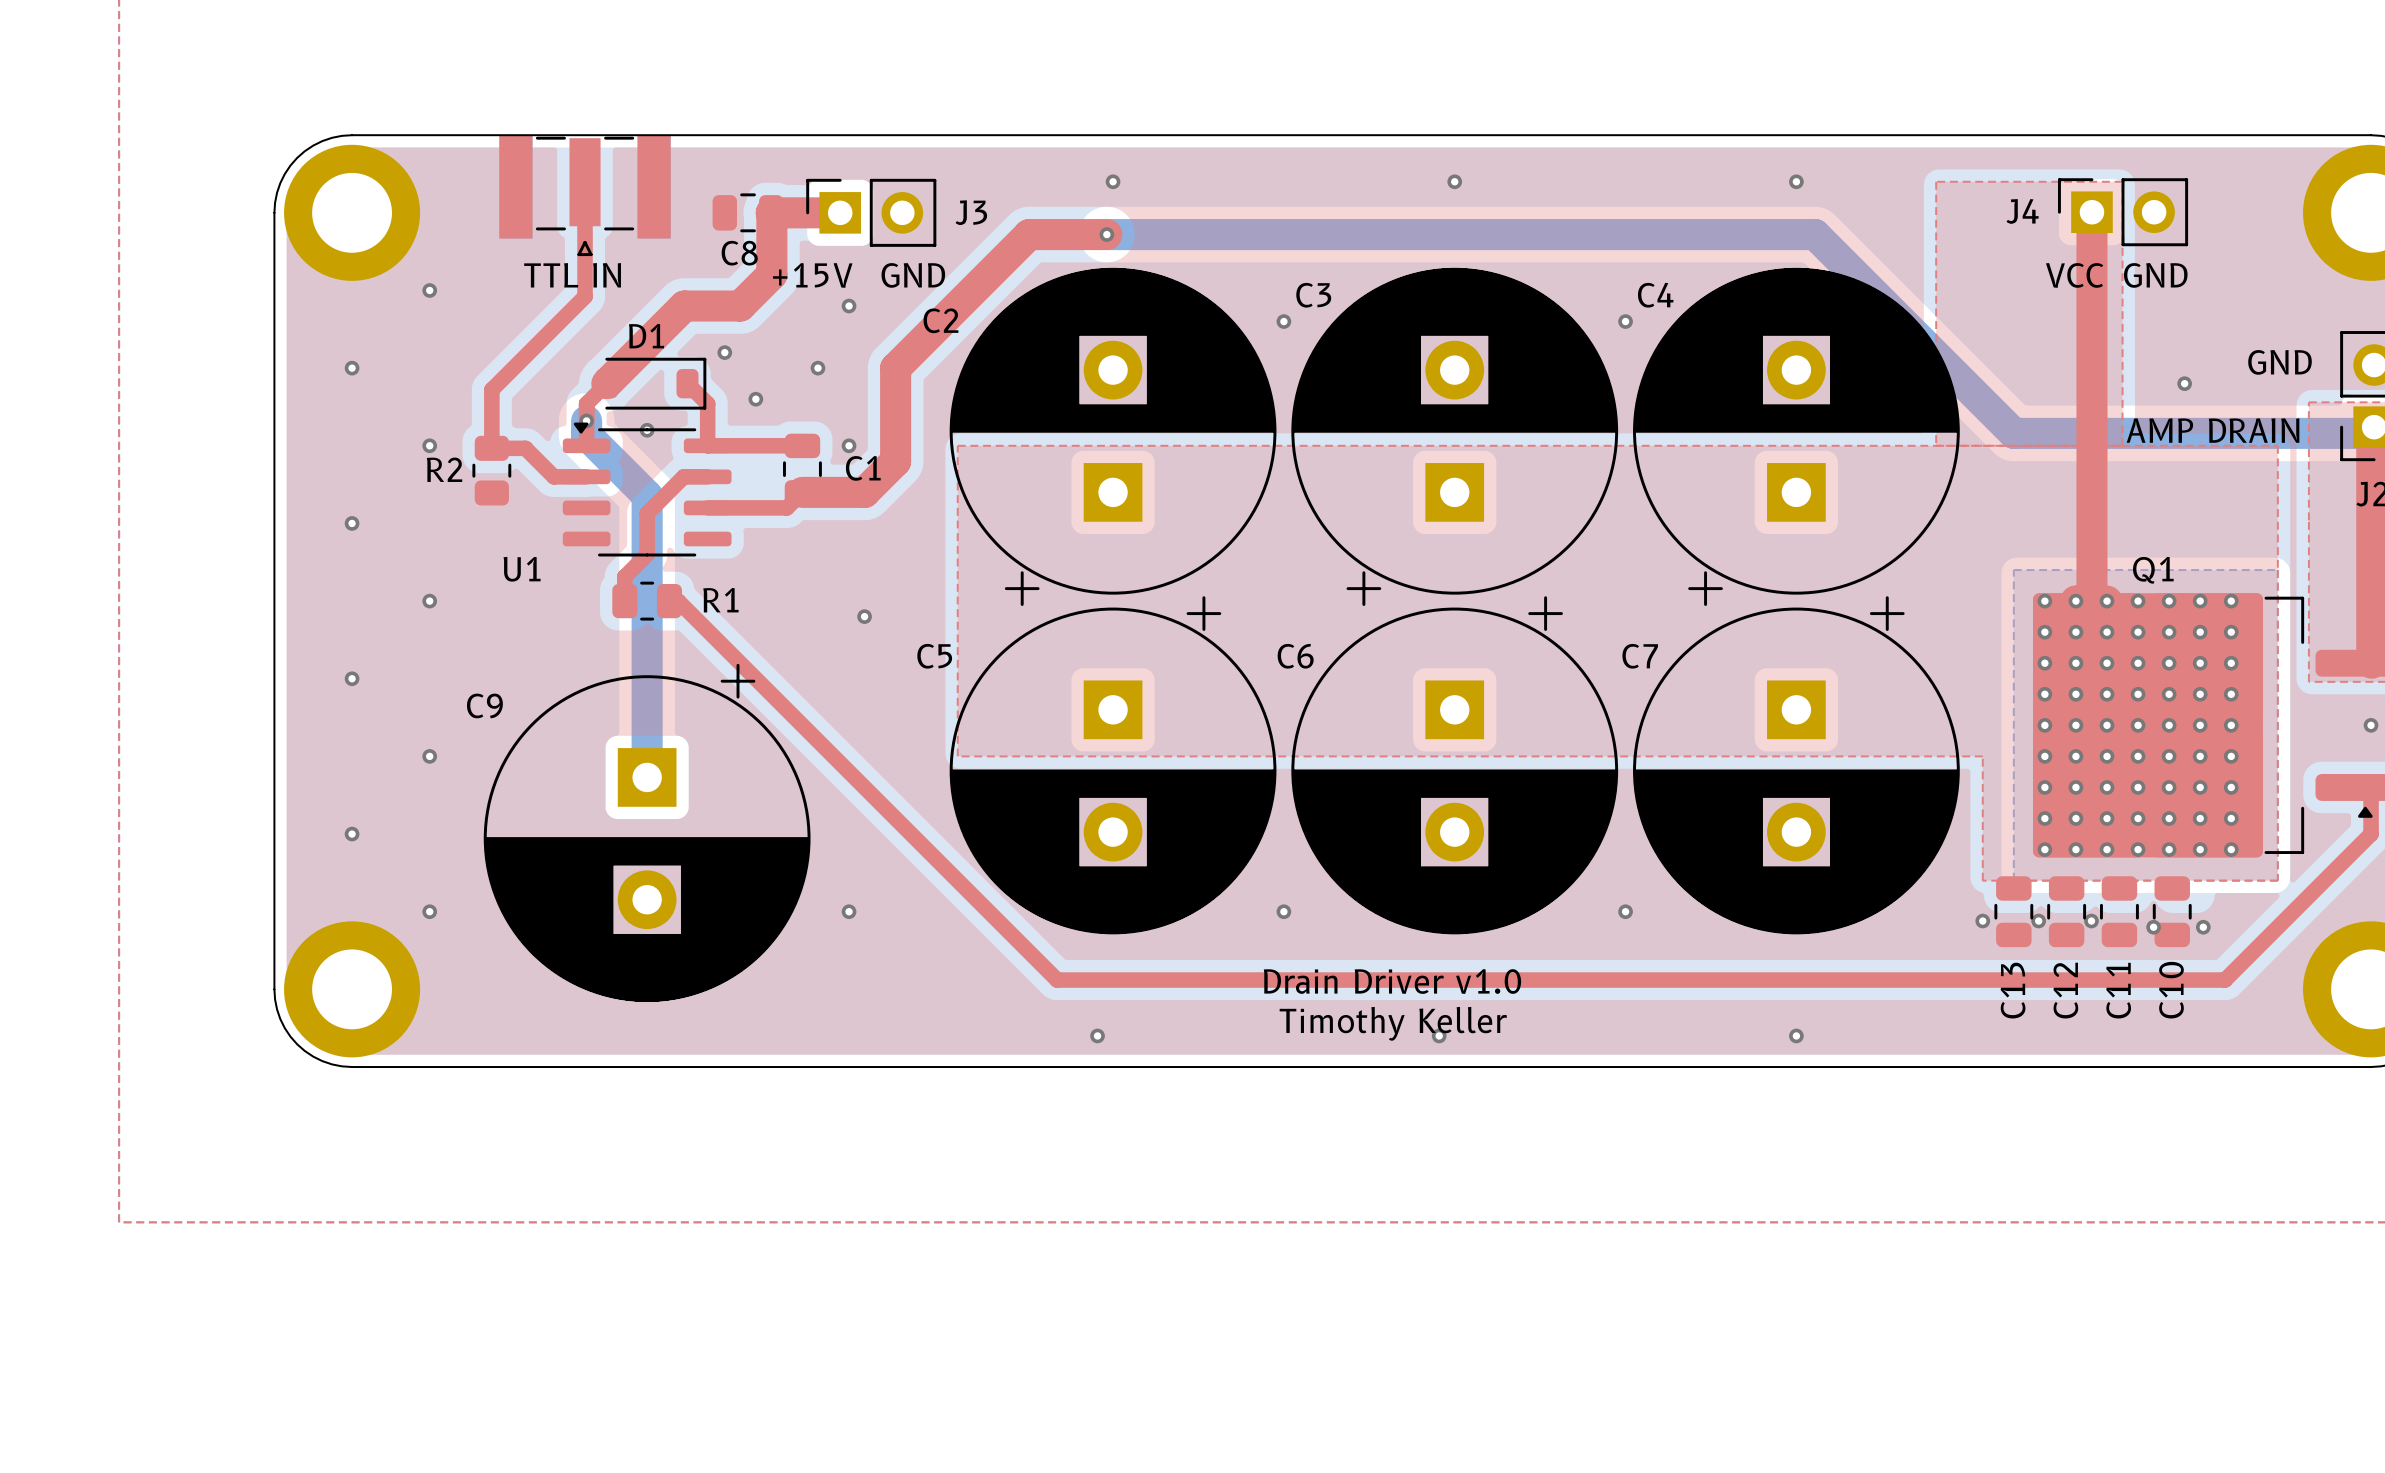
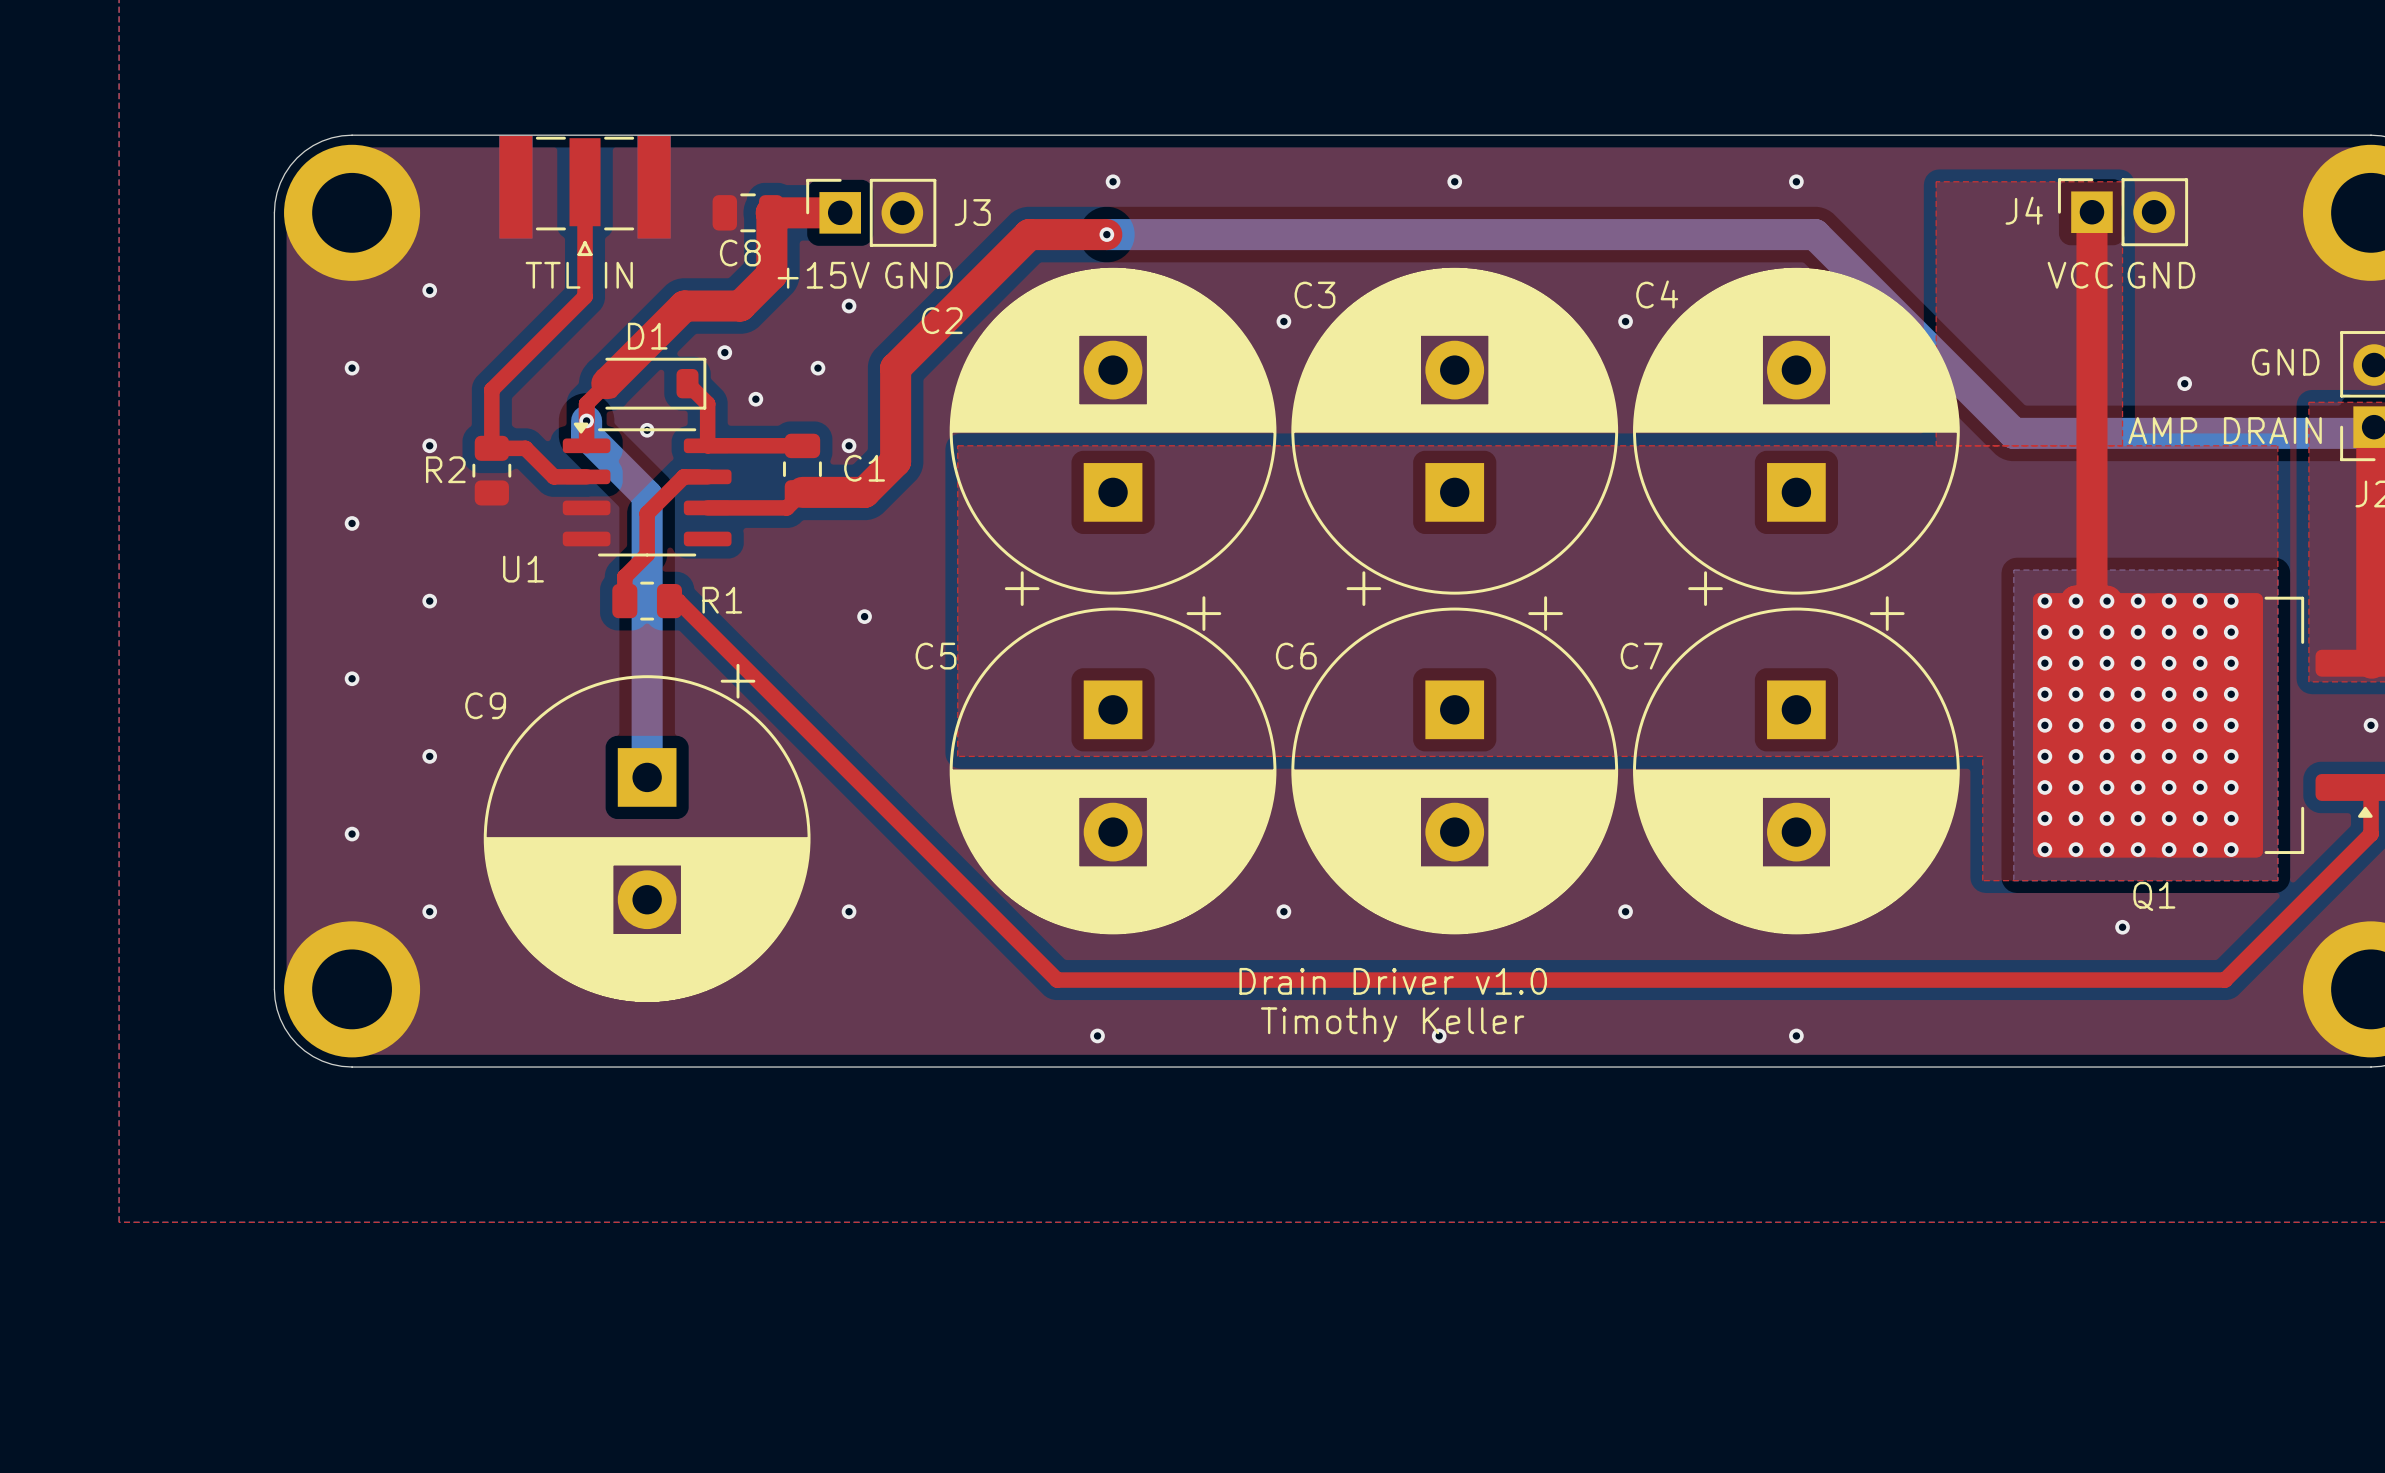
Q1 name position: Q1 (2153, 570) -> Q1 (2154, 896)
C13: (2013, 911) -> none
C12: (2066, 911) -> none
C11: (2119, 911) -> none
C10: (2172, 911) -> none
via: (1982, 921) -> none
via: (2038, 921) -> none
via: (2091, 921) -> none
via: none -> (2122, 927)
via: (2153, 927) -> none
via: (2203, 927) -> none

